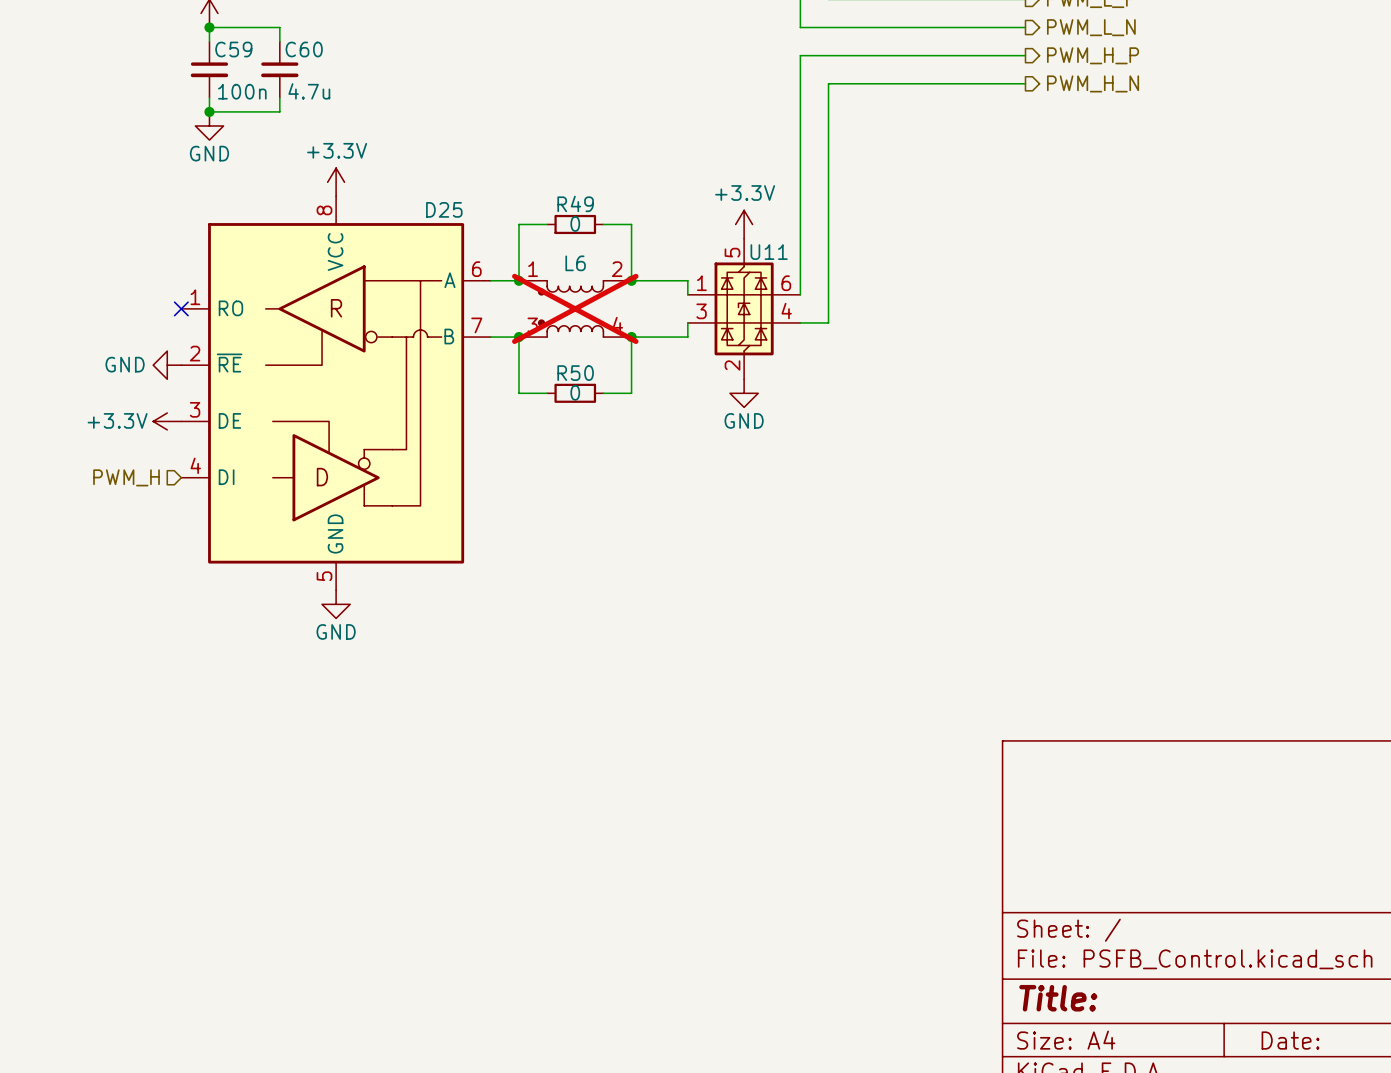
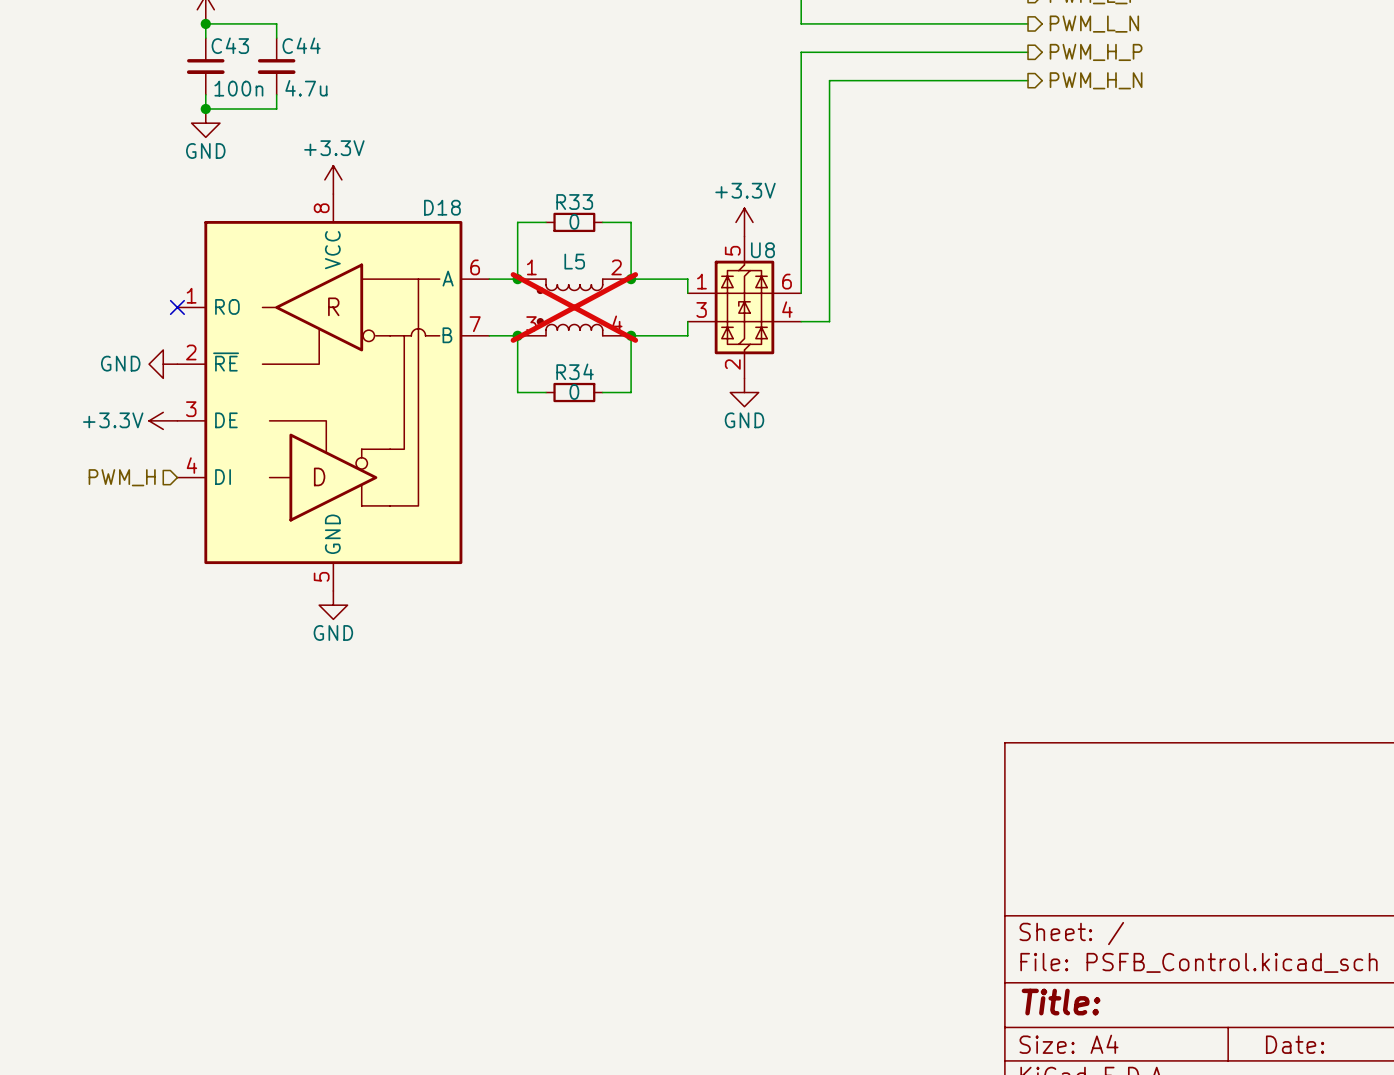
C59 name: C59 (233, 49) -> C43 (230, 45)
C60 name: C60 (304, 49) -> C44 (301, 45)
R49 name: R49 (575, 203) -> R33 (574, 202)
D25 name: D25 (444, 209) -> D18 (442, 207)
U11 name: U11 (769, 252) -> U8 (762, 250)
L6 name: L6 (575, 263) -> L5 (574, 261)
R50 name: R50 (575, 373) -> R34 (575, 371)

